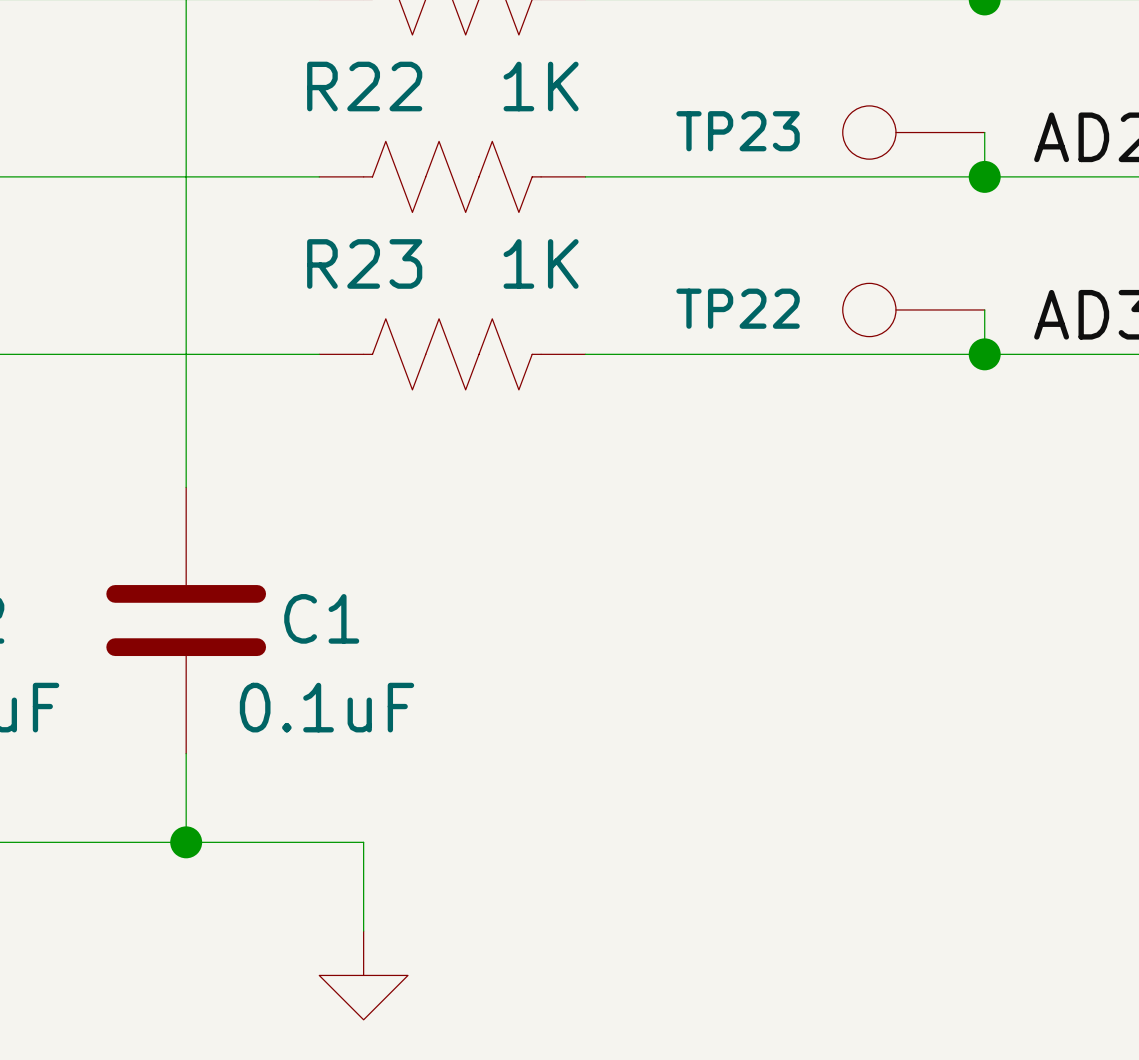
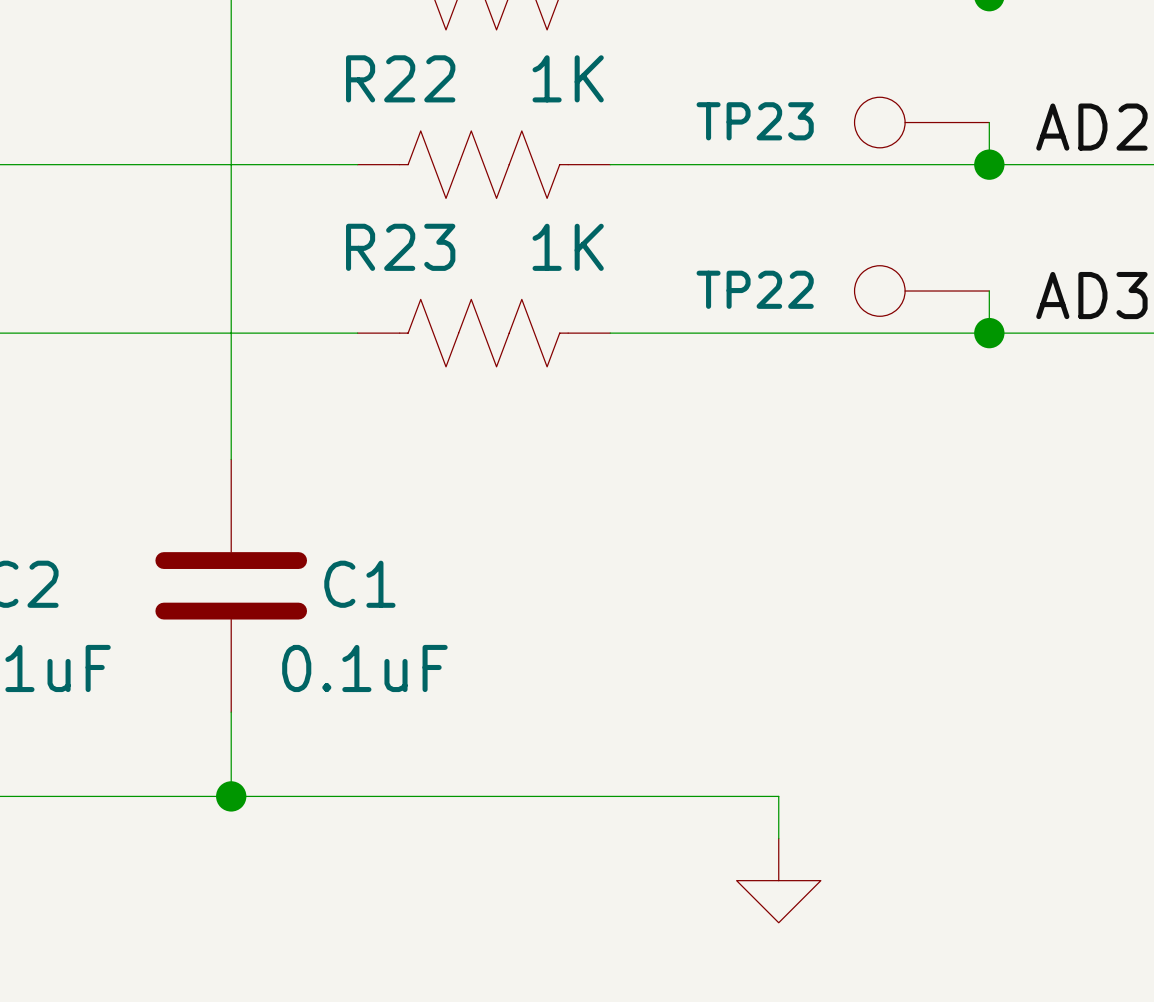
wire: (363, 842) (363, 931) -> (399, 796) (778, 796) (778, 838)
power symbol position: (363, 975) -> (778, 880)

